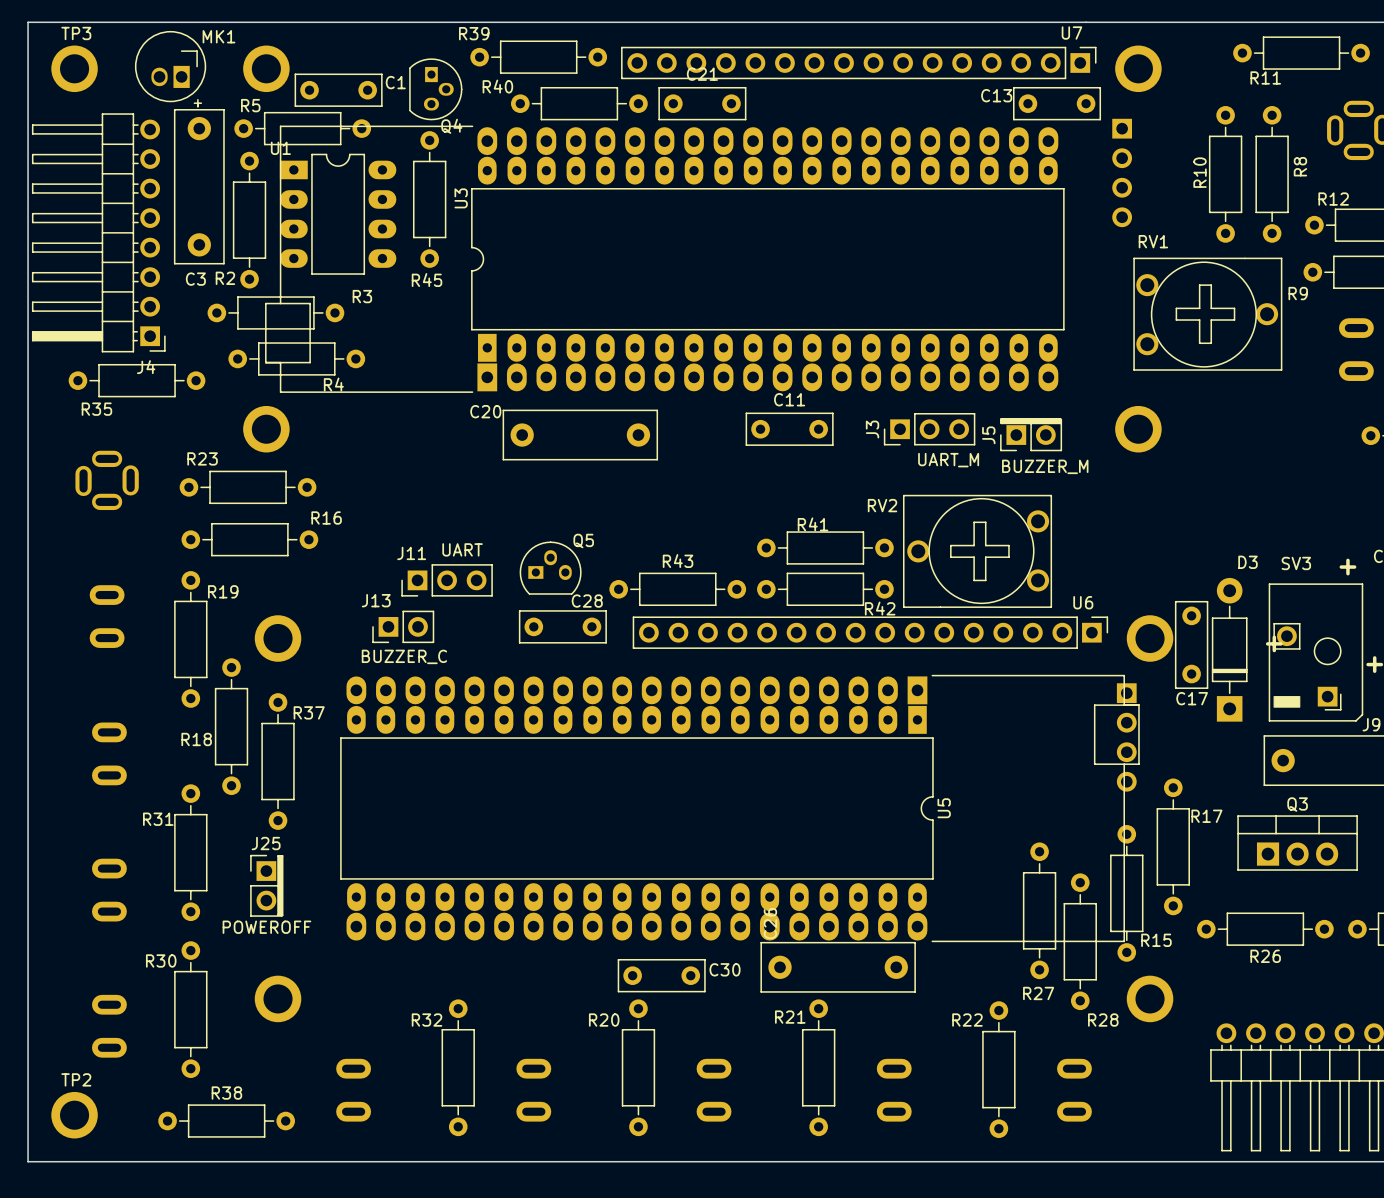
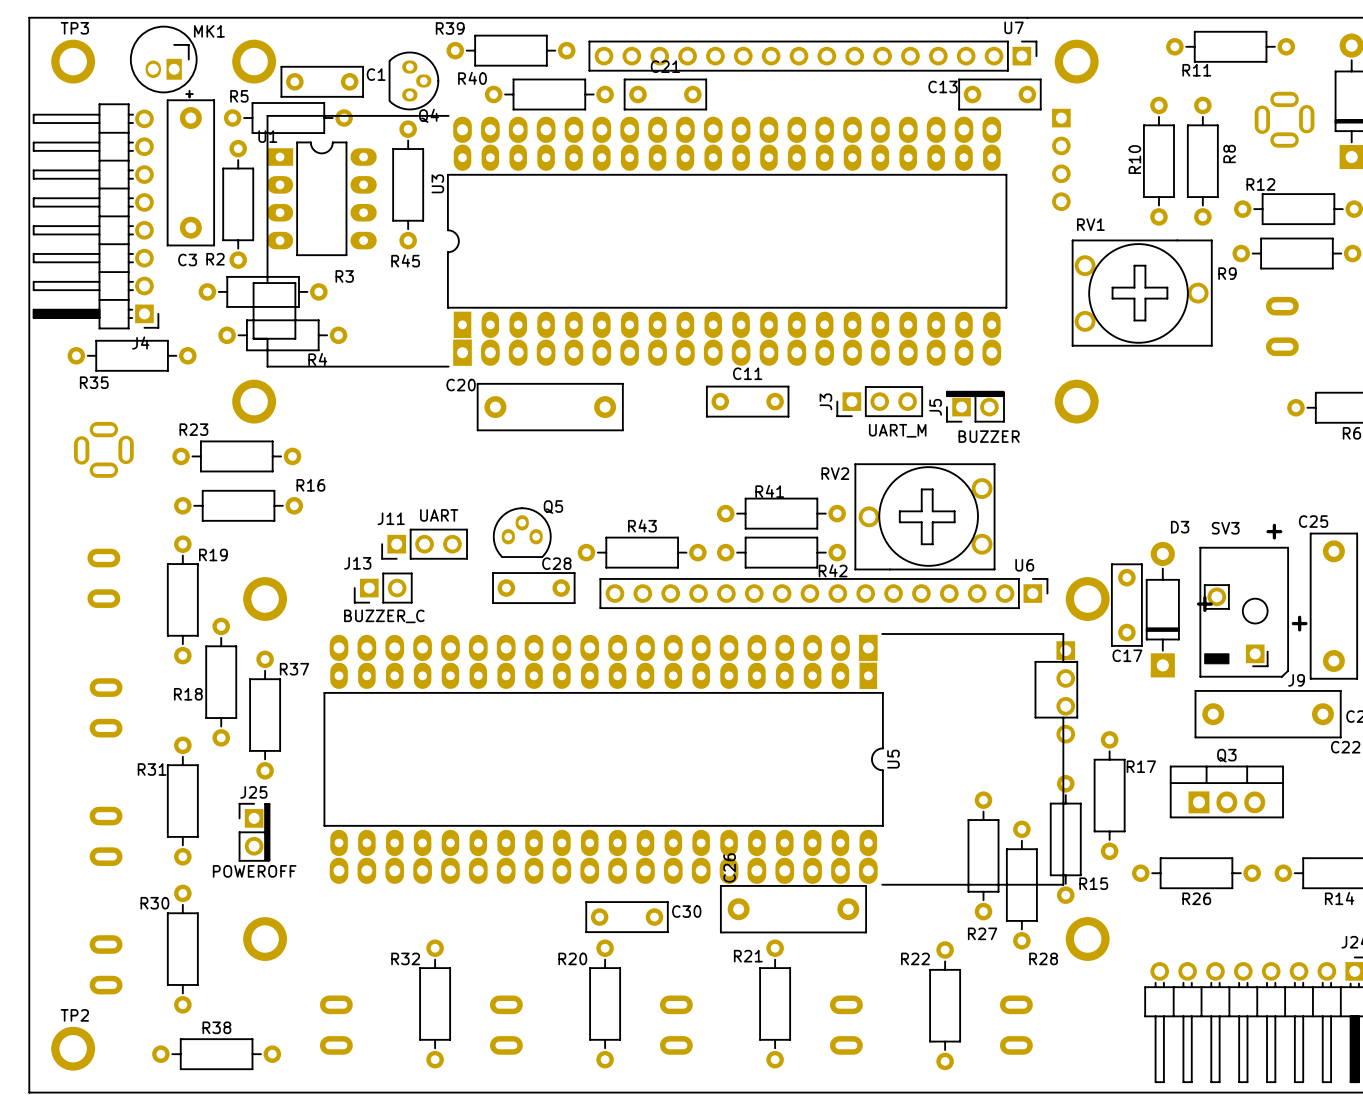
Q4 footprint: [409, 58, 463, 121] -> [388, 51, 440, 111]
J5 value: BUZZER_M (1045, 466) -> BUZZER (989, 436)
Q5 footprint: [519, 541, 582, 595] -> [493, 507, 552, 558]

